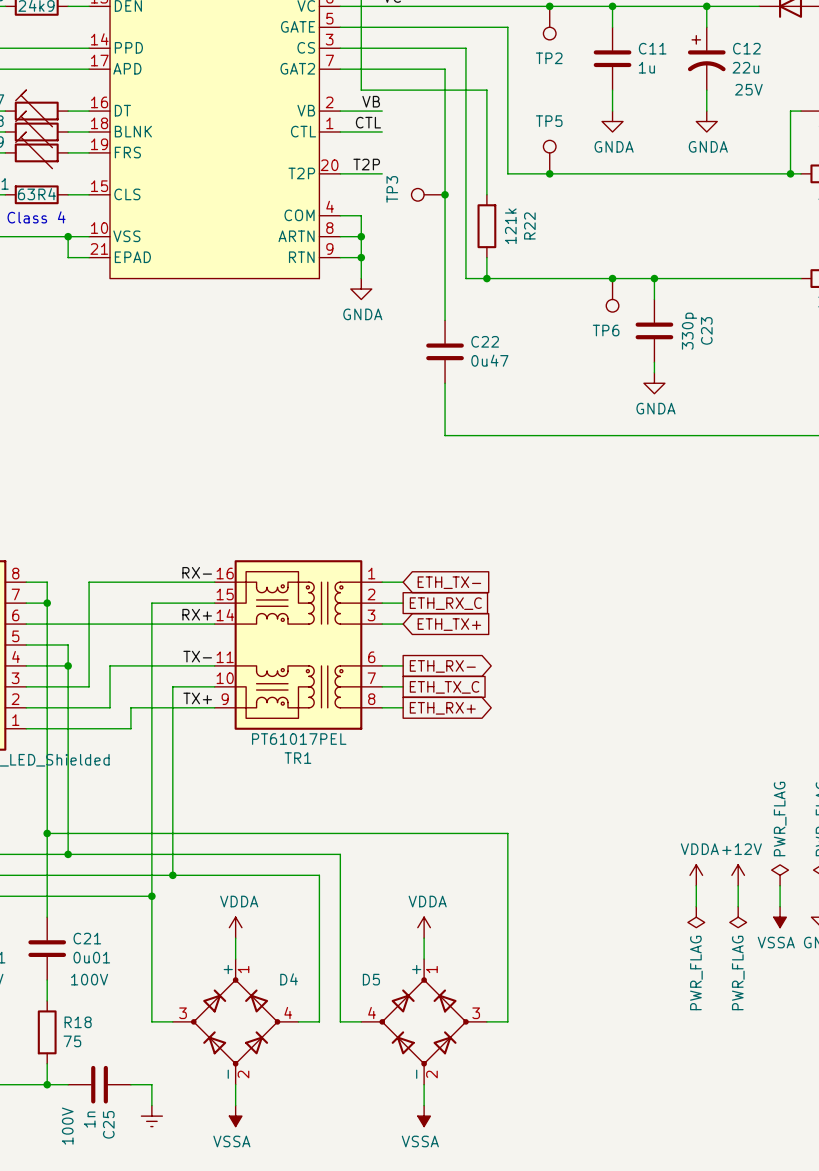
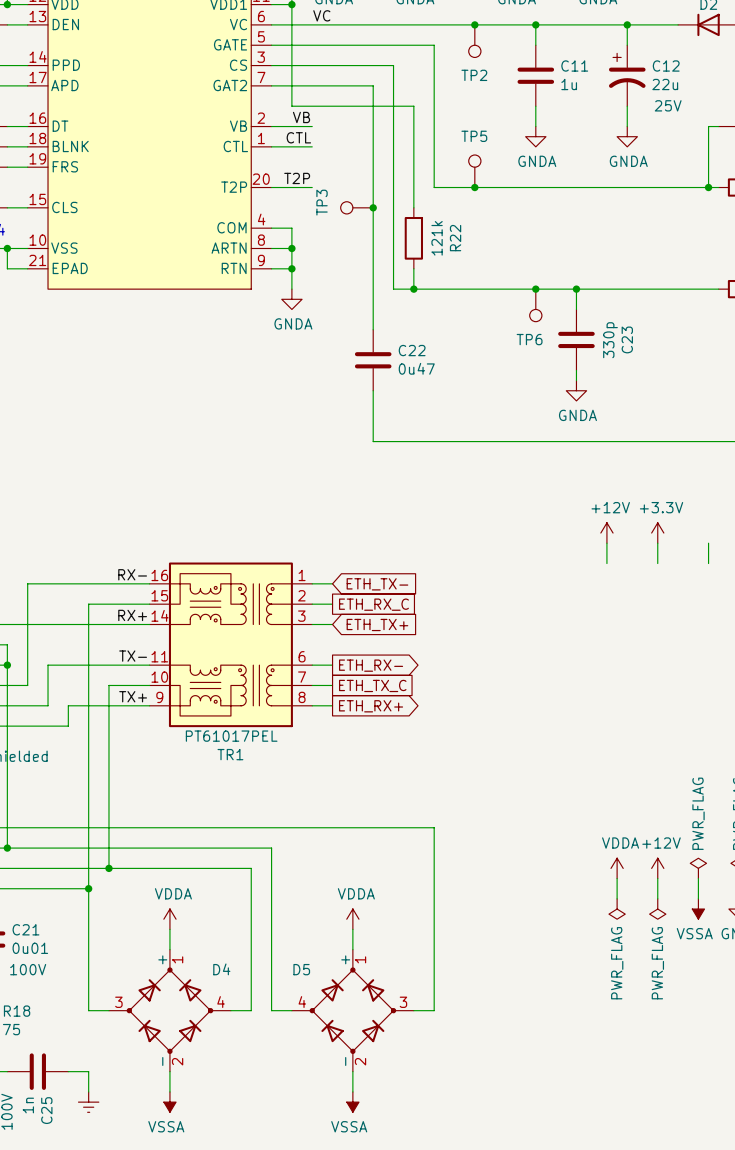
power symbol: none -> +12V (606, 533)
power symbol: none -> +3.3V (657, 533)
wire: none -> (606, 543) (606, 563)
wire: none -> (657, 543) (657, 563)
wire: none -> (708, 543) (708, 563)

